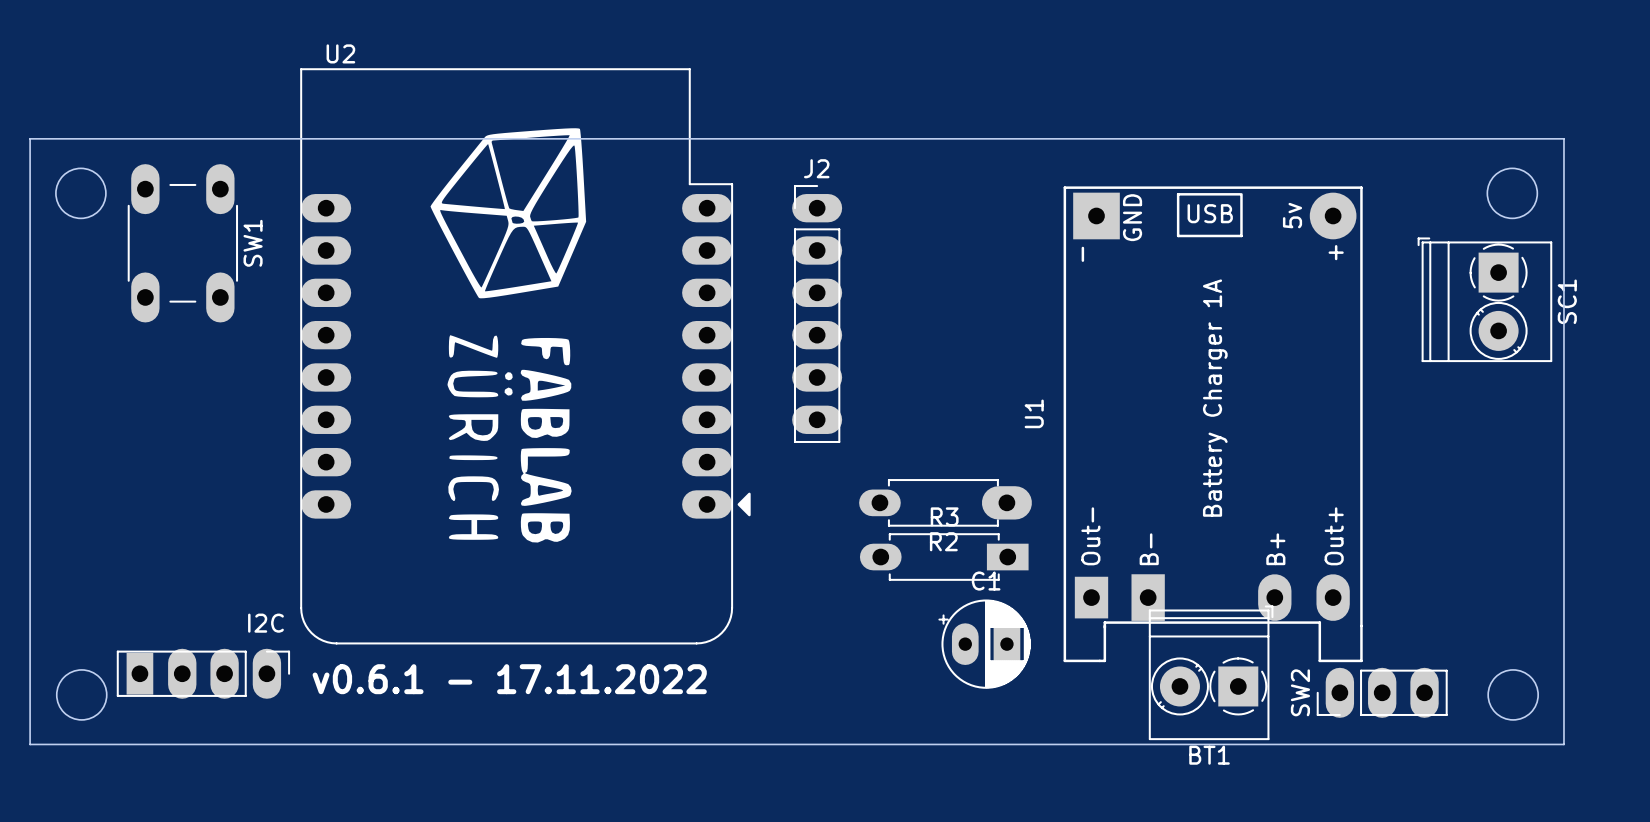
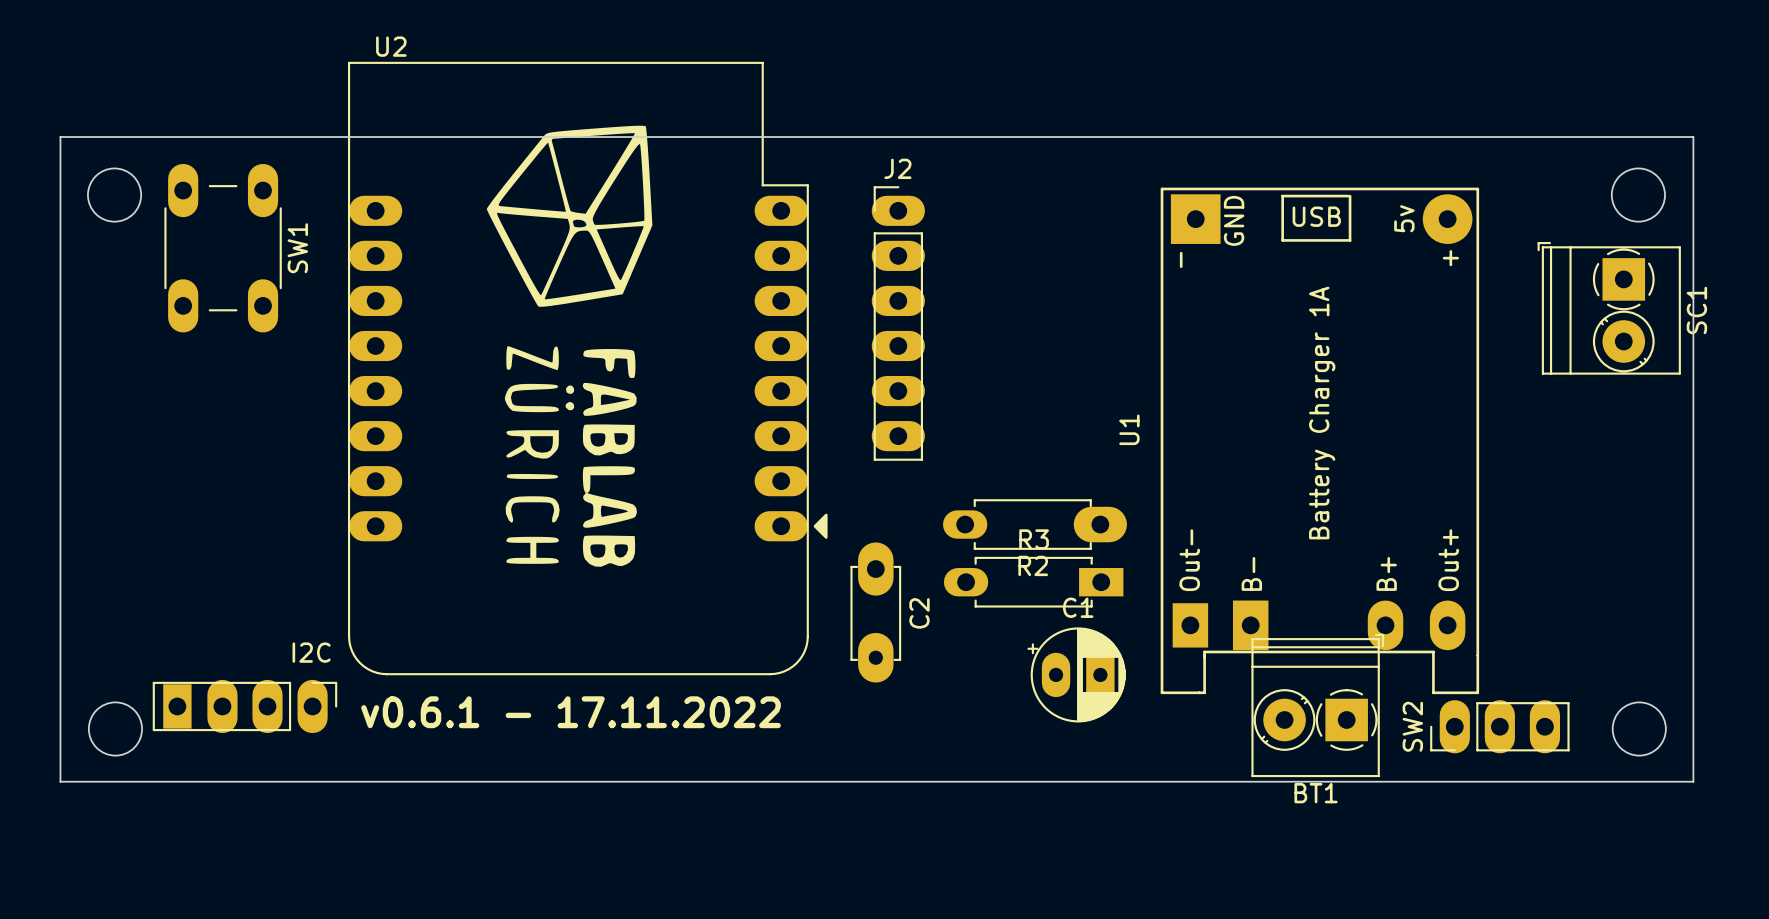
C2: none -> (875, 612)

